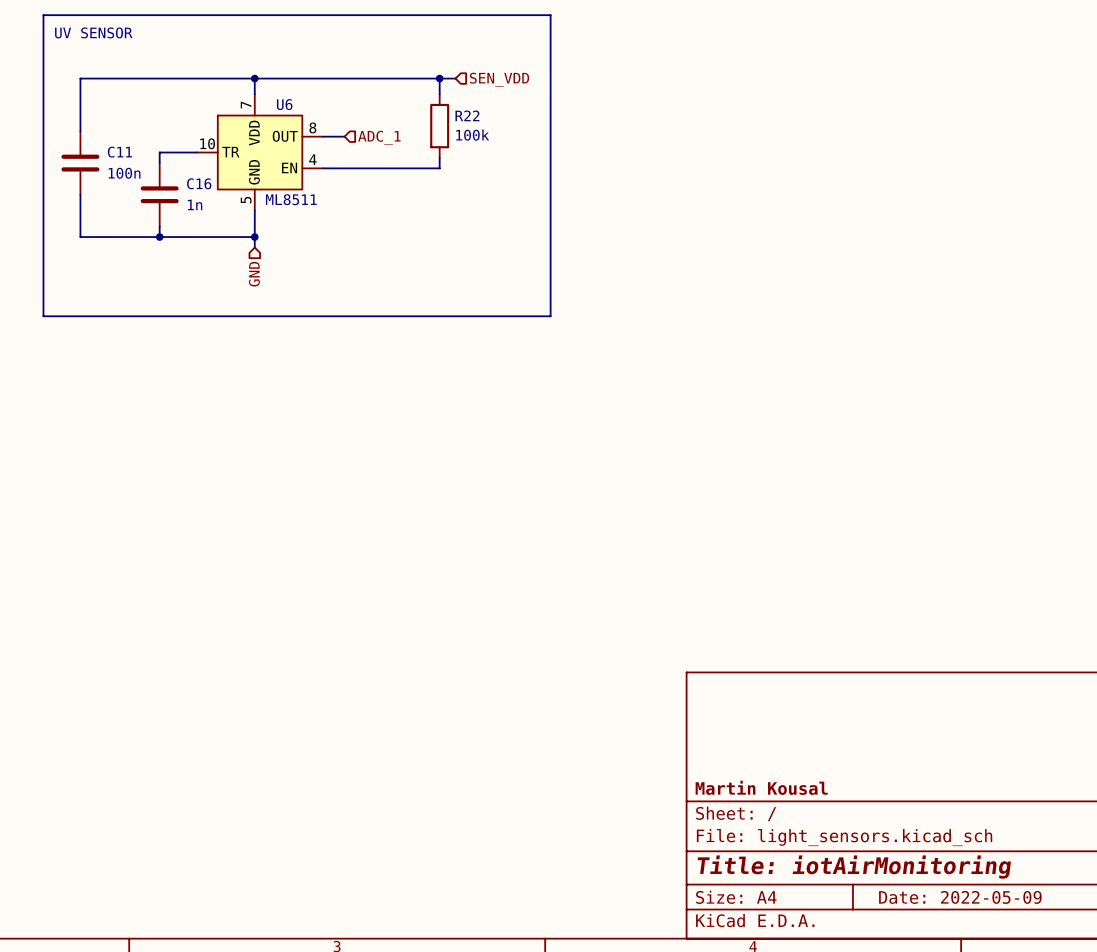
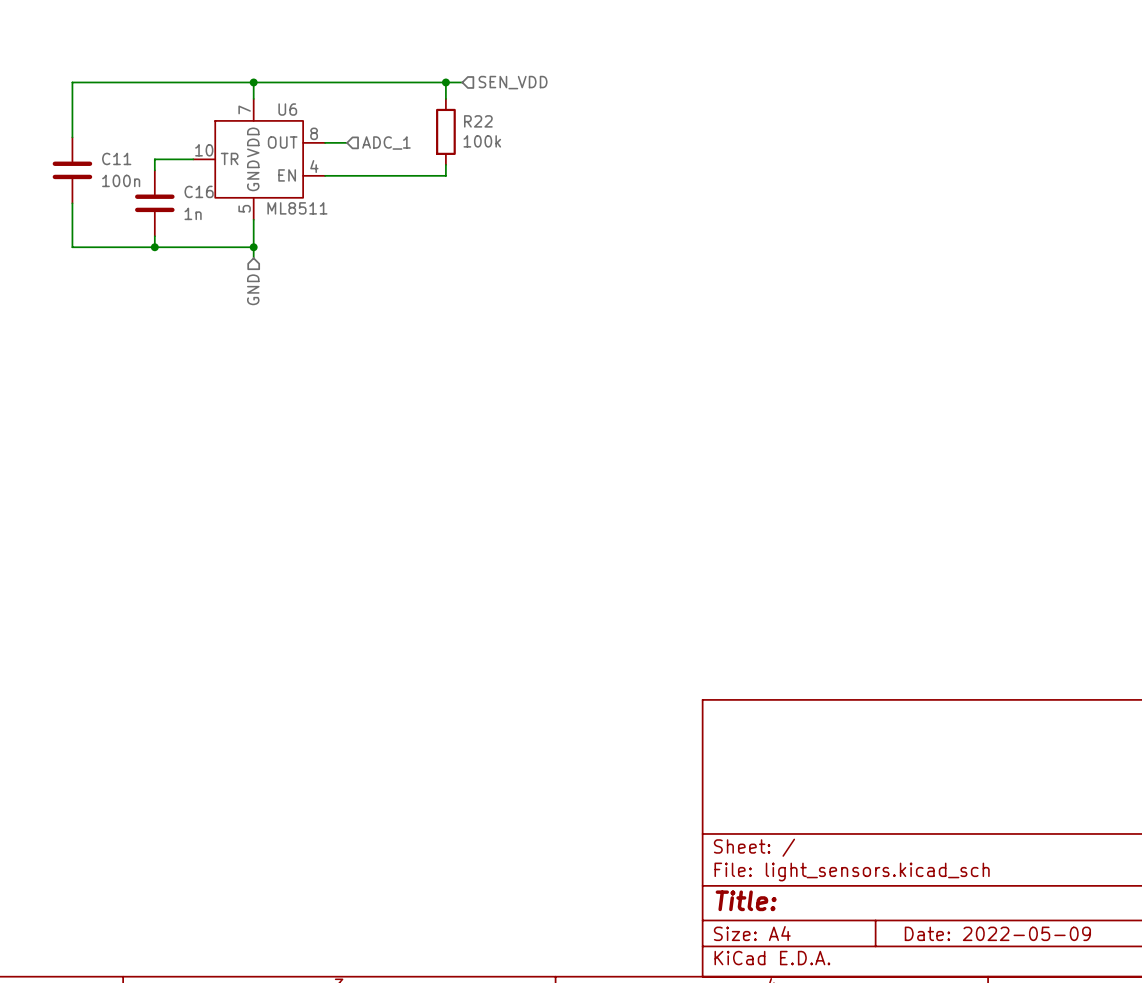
line: (43, 15) (550, 15) (550, 316) (43, 316) (43, 15) -> none
text: UV SENSOR (93, 32) -> none
title block: Martin Kousal (761, 787) -> none
title block: Title: iotAirMonitoring (854, 867) -> Title: (746, 900)

